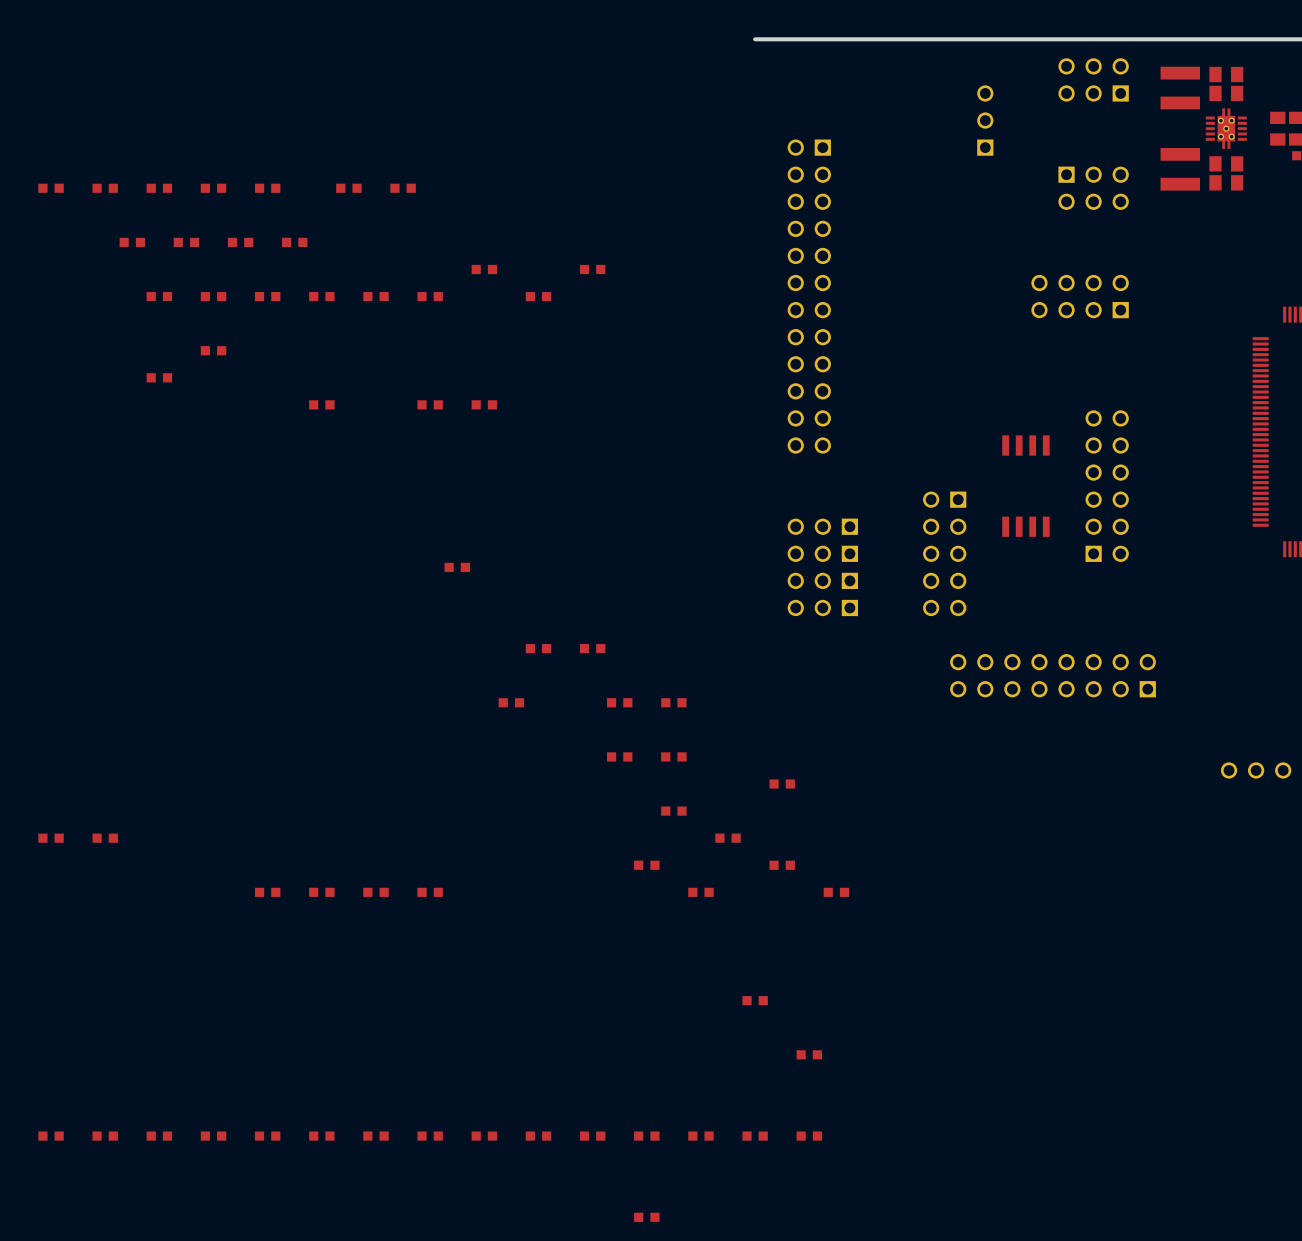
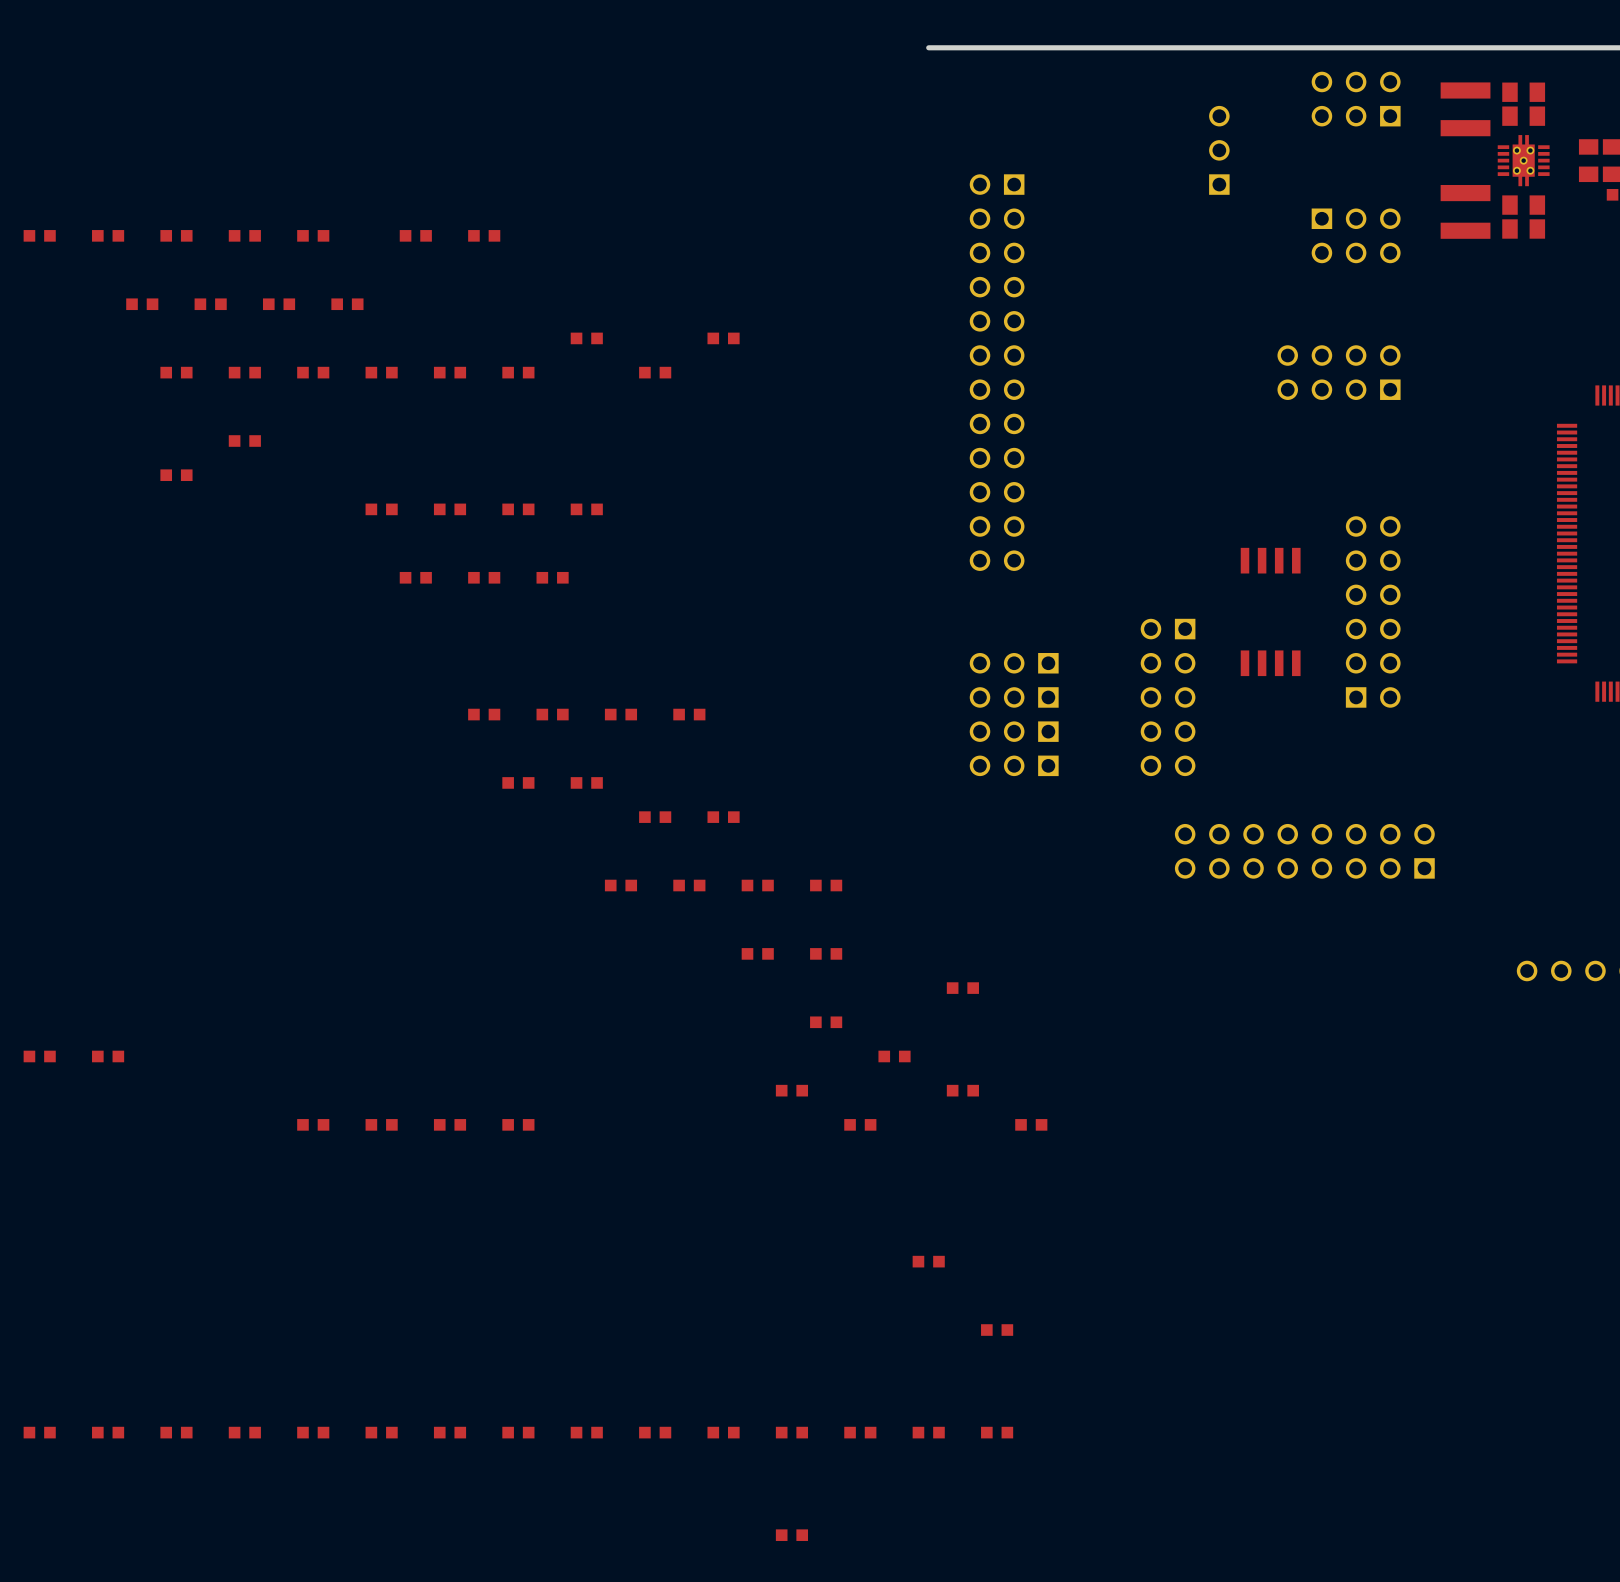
part: none -> (450, 509)
part: none -> (415, 577)
part: none -> (484, 577)
part: none -> (552, 577)
part: none -> (484, 714)
part: none -> (620, 714)
part: none -> (689, 714)
part: none -> (518, 782)
part: none -> (586, 782)
part: none -> (689, 885)

